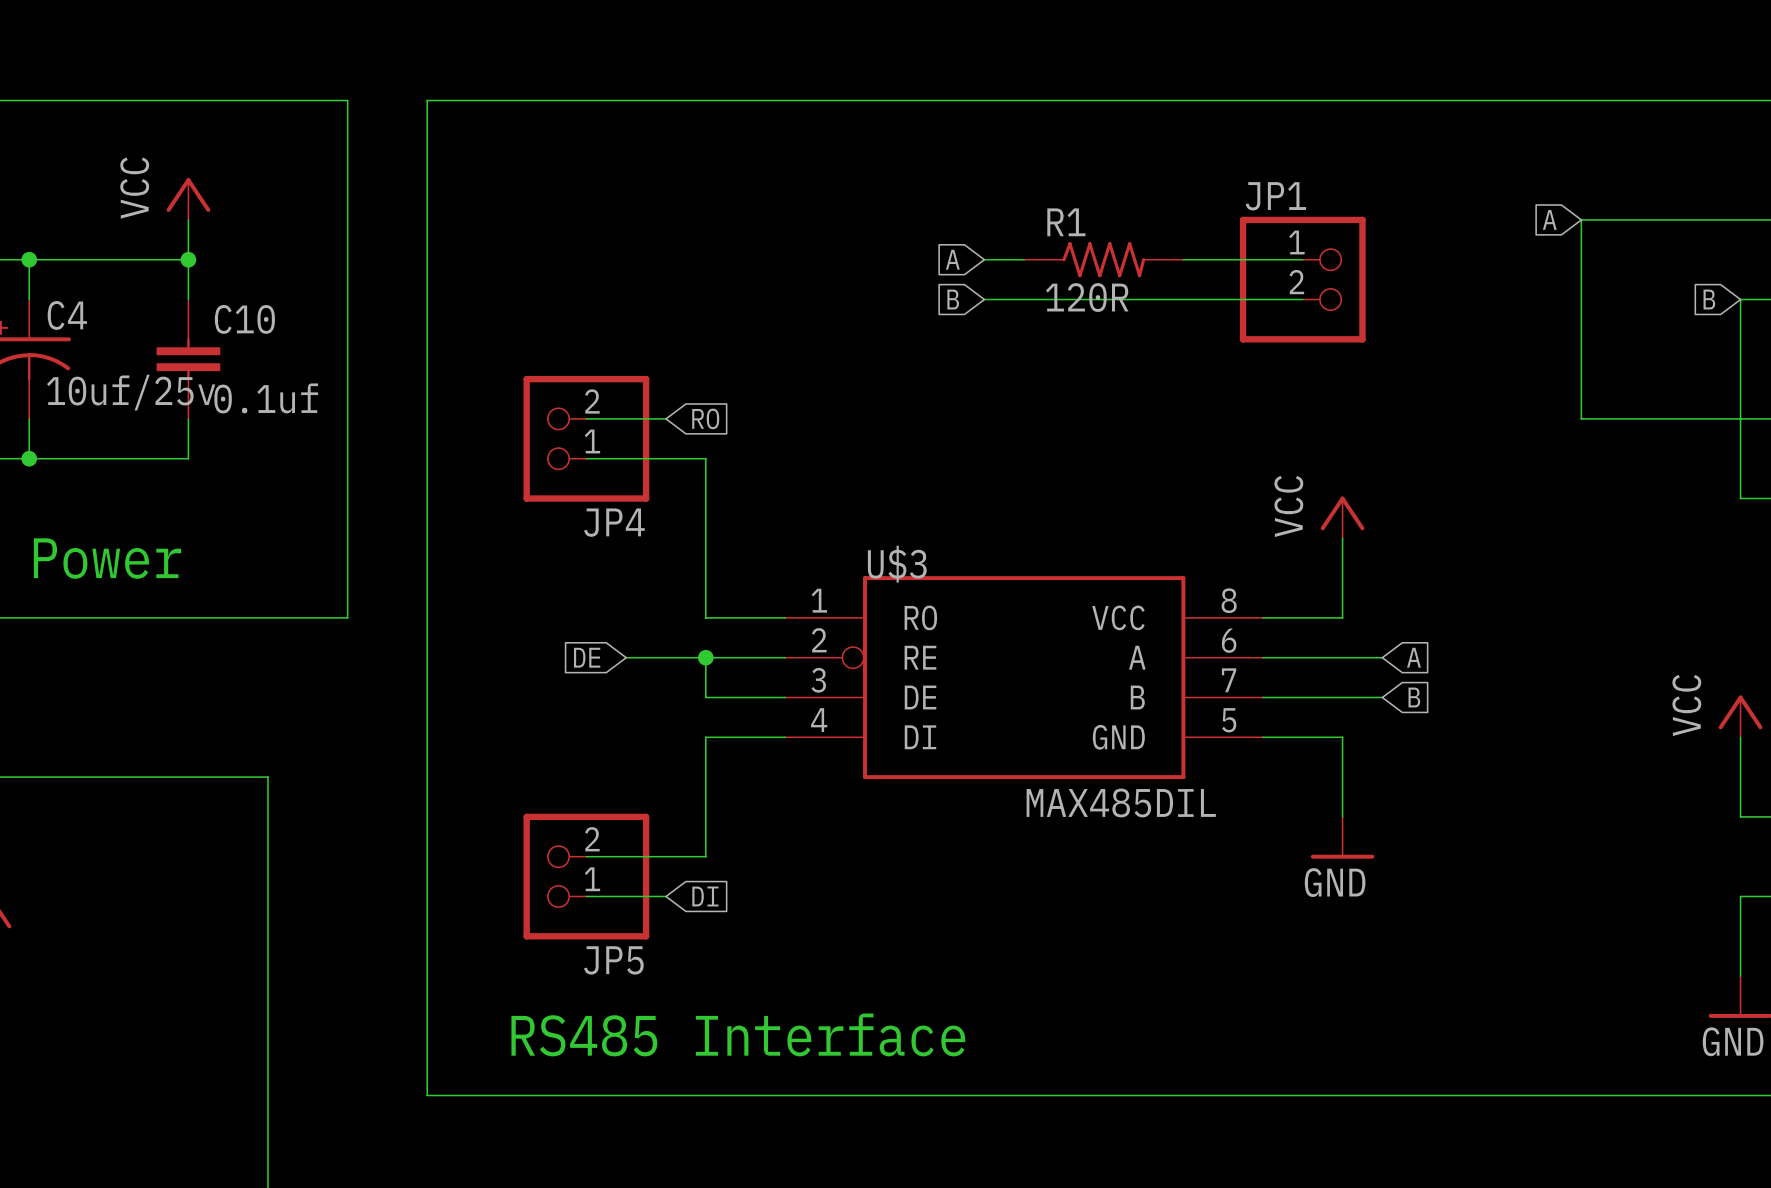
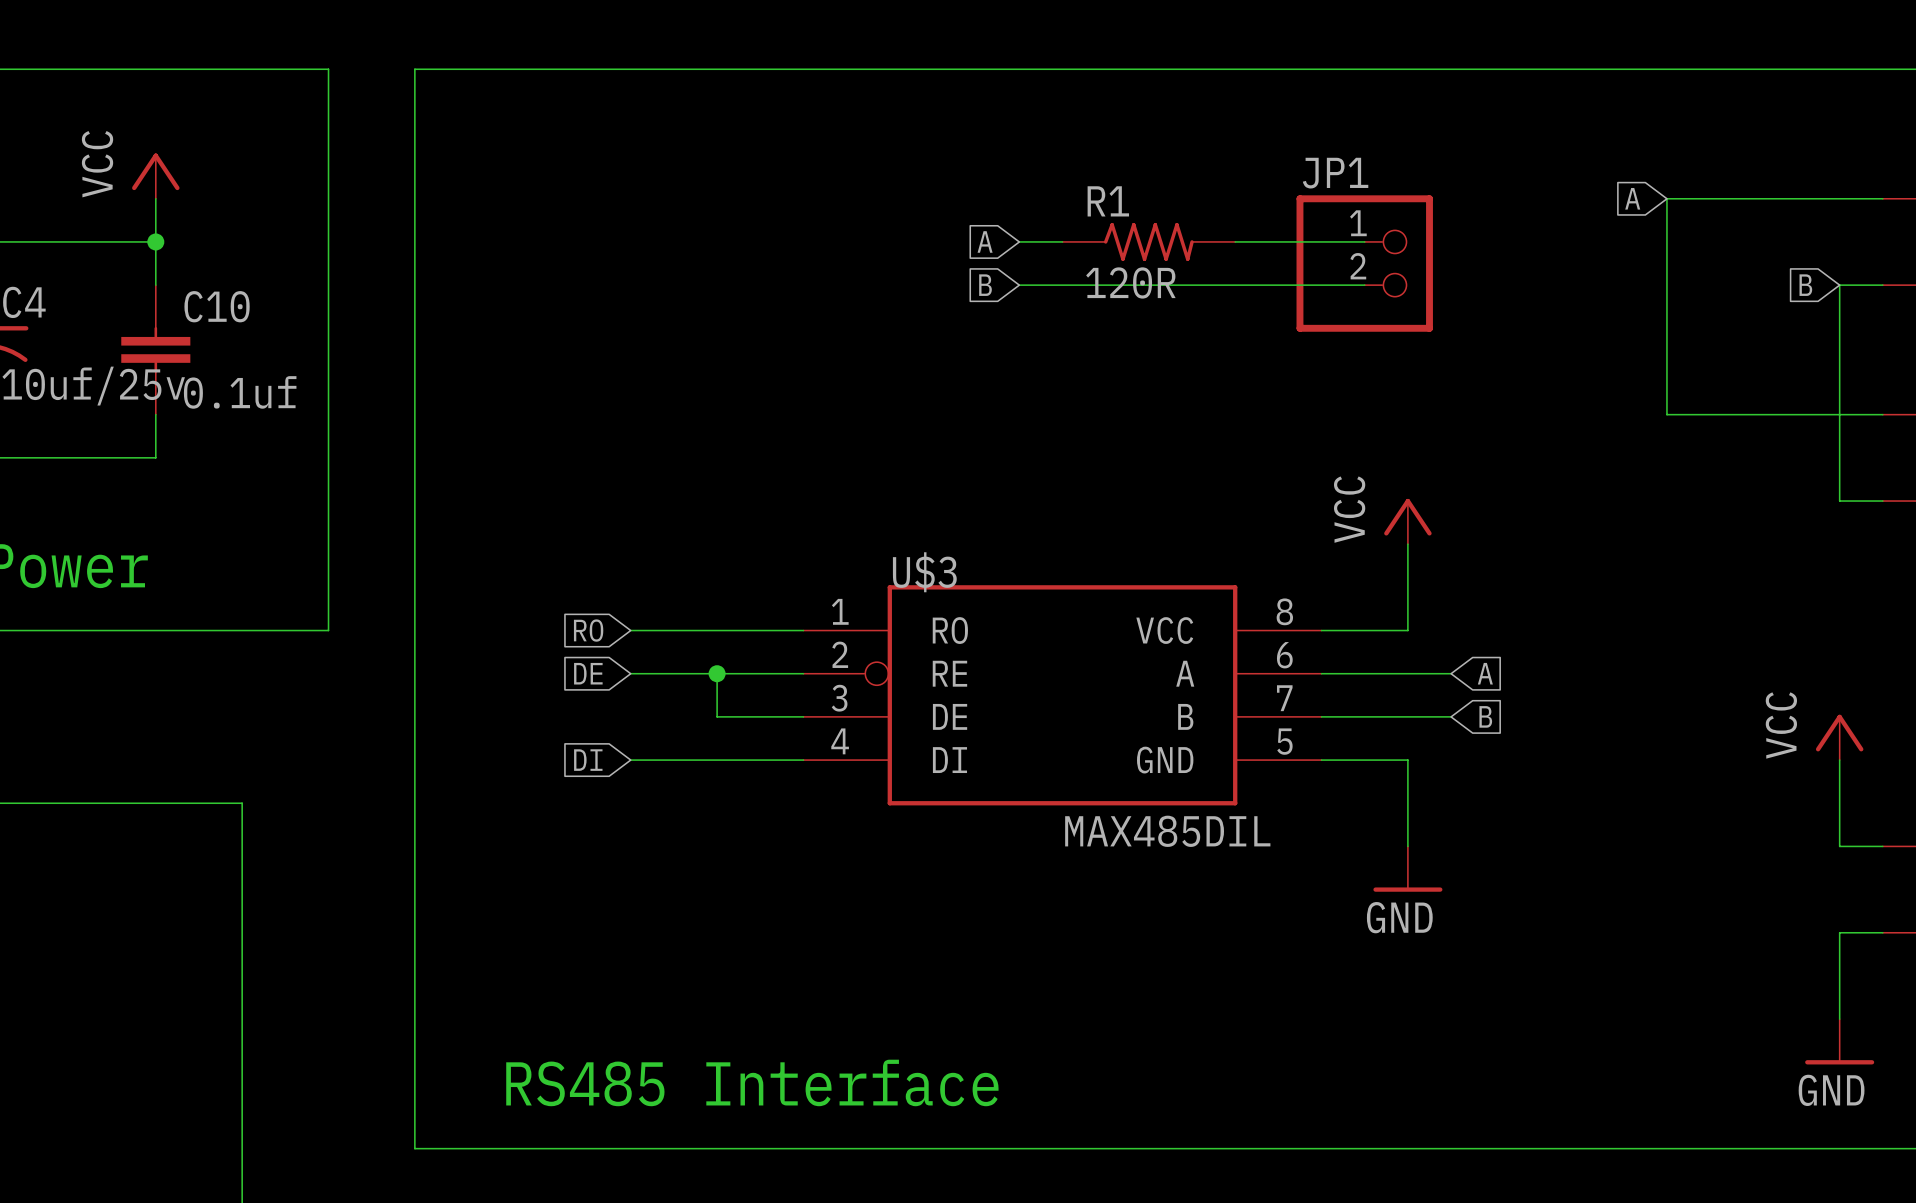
wire: (586, 418) (666, 418) -> none
global label rotation: 0° (705, 418) -> 180° (588, 630)
global label position: RO (705, 418) -> RO (588, 630)
JP4: (586, 438) -> none
wire: (586, 458) (705, 458) (705, 617) -> (630, 630) (717, 630)
wire: (705, 737) (705, 856) (586, 856) -> (717, 760) (630, 760)
JP5: (586, 876) -> none
wire: (586, 896) (666, 896) -> none
global label rotation: 0° (705, 896) -> 180° (588, 760)
global label position: DI (705, 896) -> DI (588, 760)

